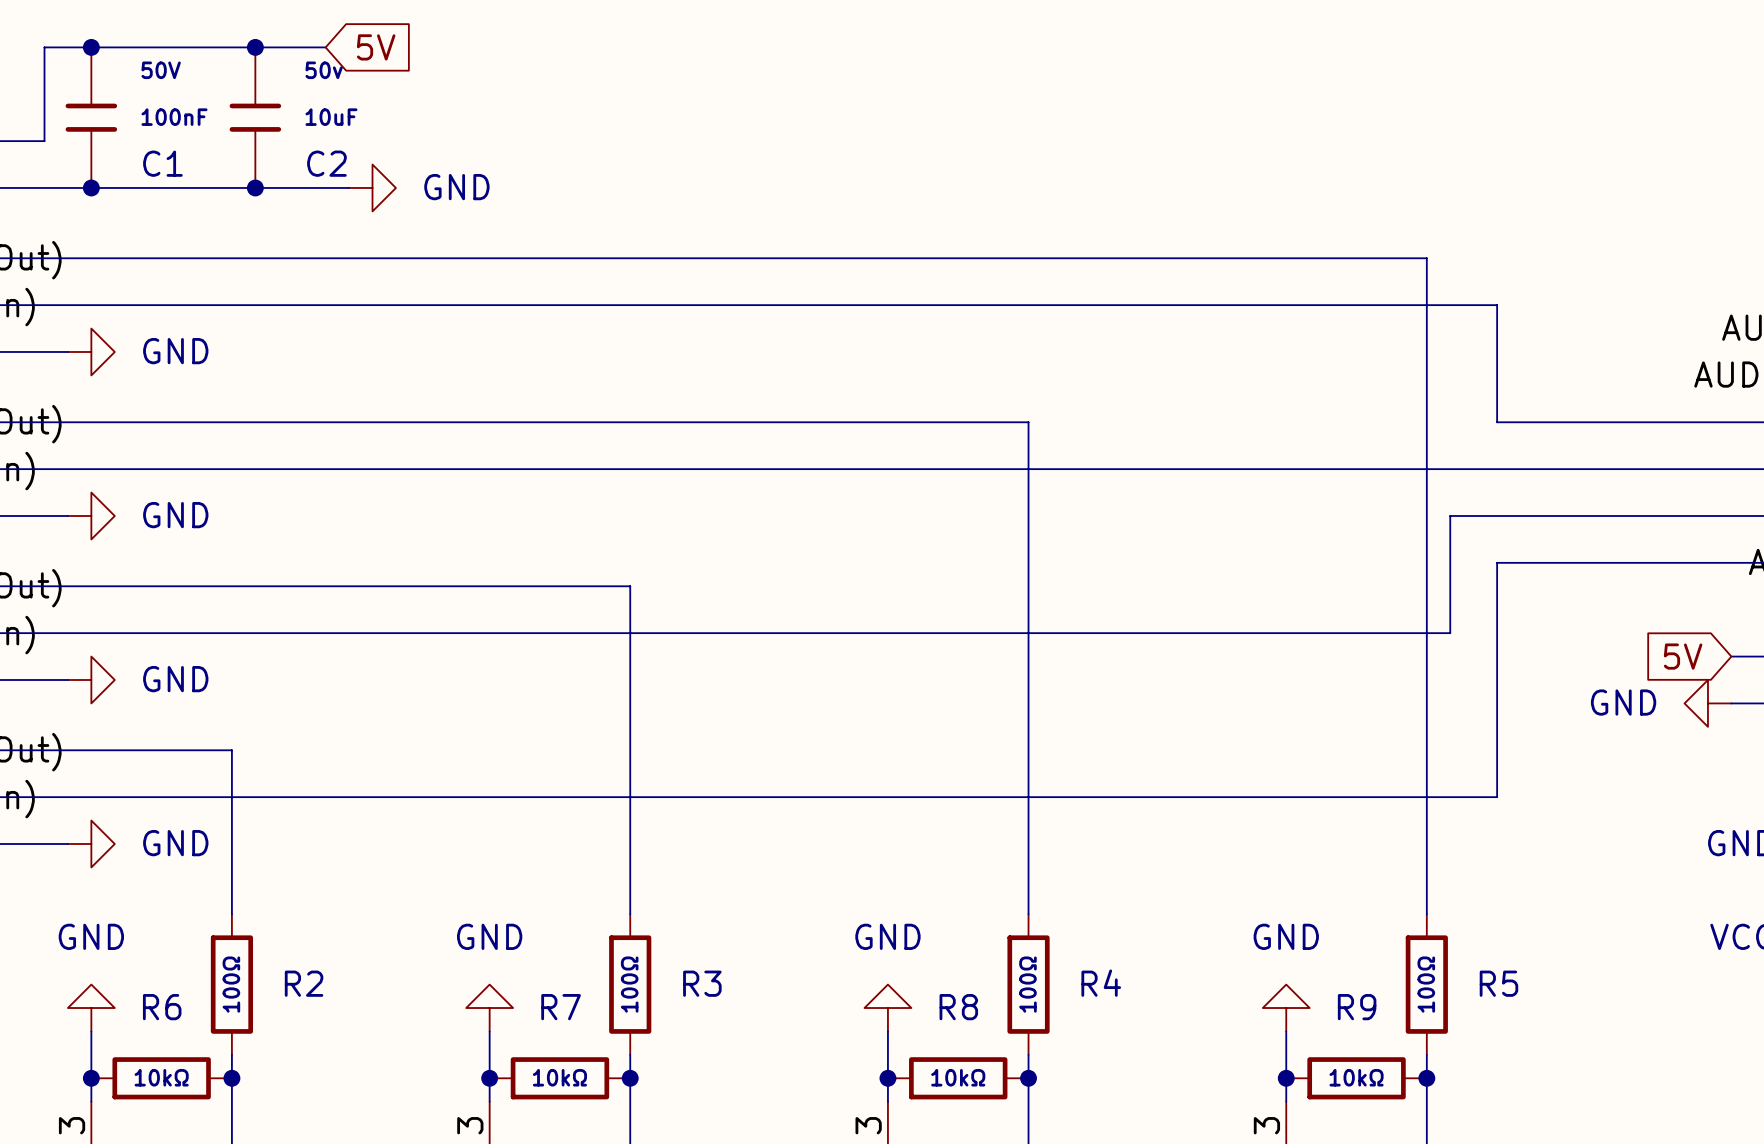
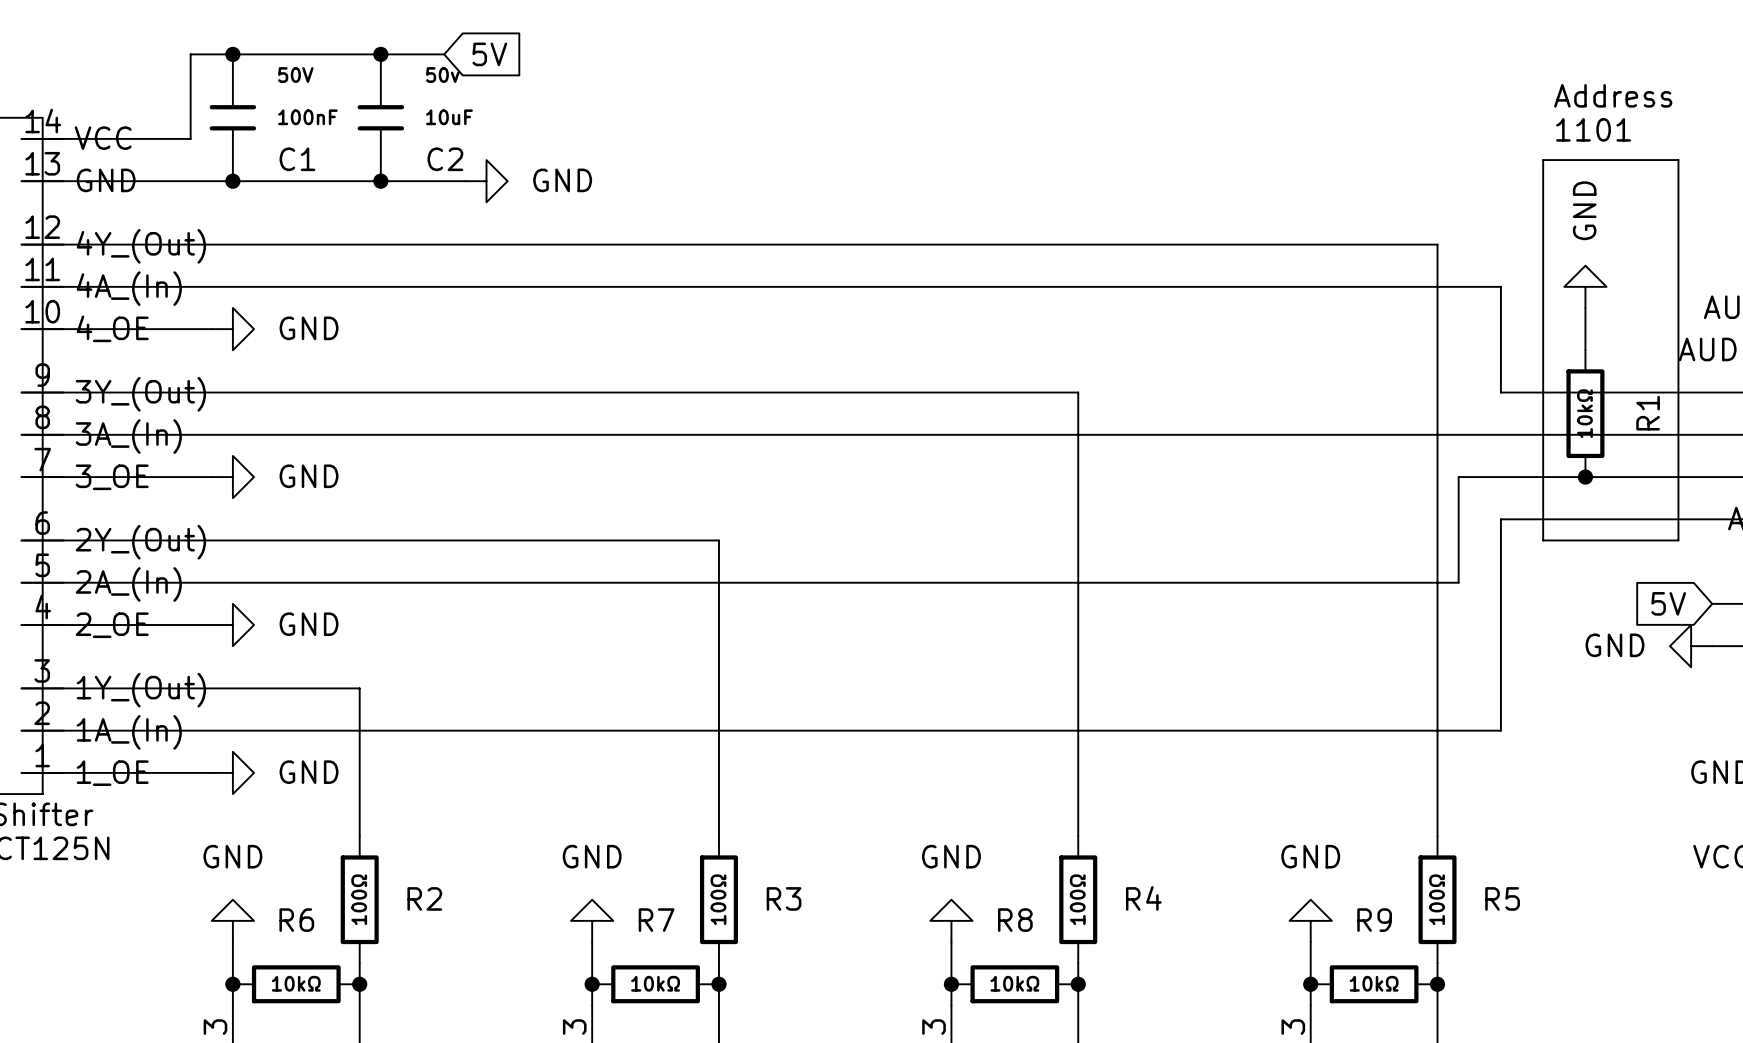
text: none -> Address (1613, 95)
text: none -> 1101 (1593, 129)
line: none -> (1543, 160) (1678, 160) (1678, 540) (1543, 540) (1543, 160)
power symbol: none -> GND (1585, 286)
wire: none -> (1585, 308) (1585, 350)
R1: none -> 10kΩ (1585, 413)
junction: none -> (1585, 477)

